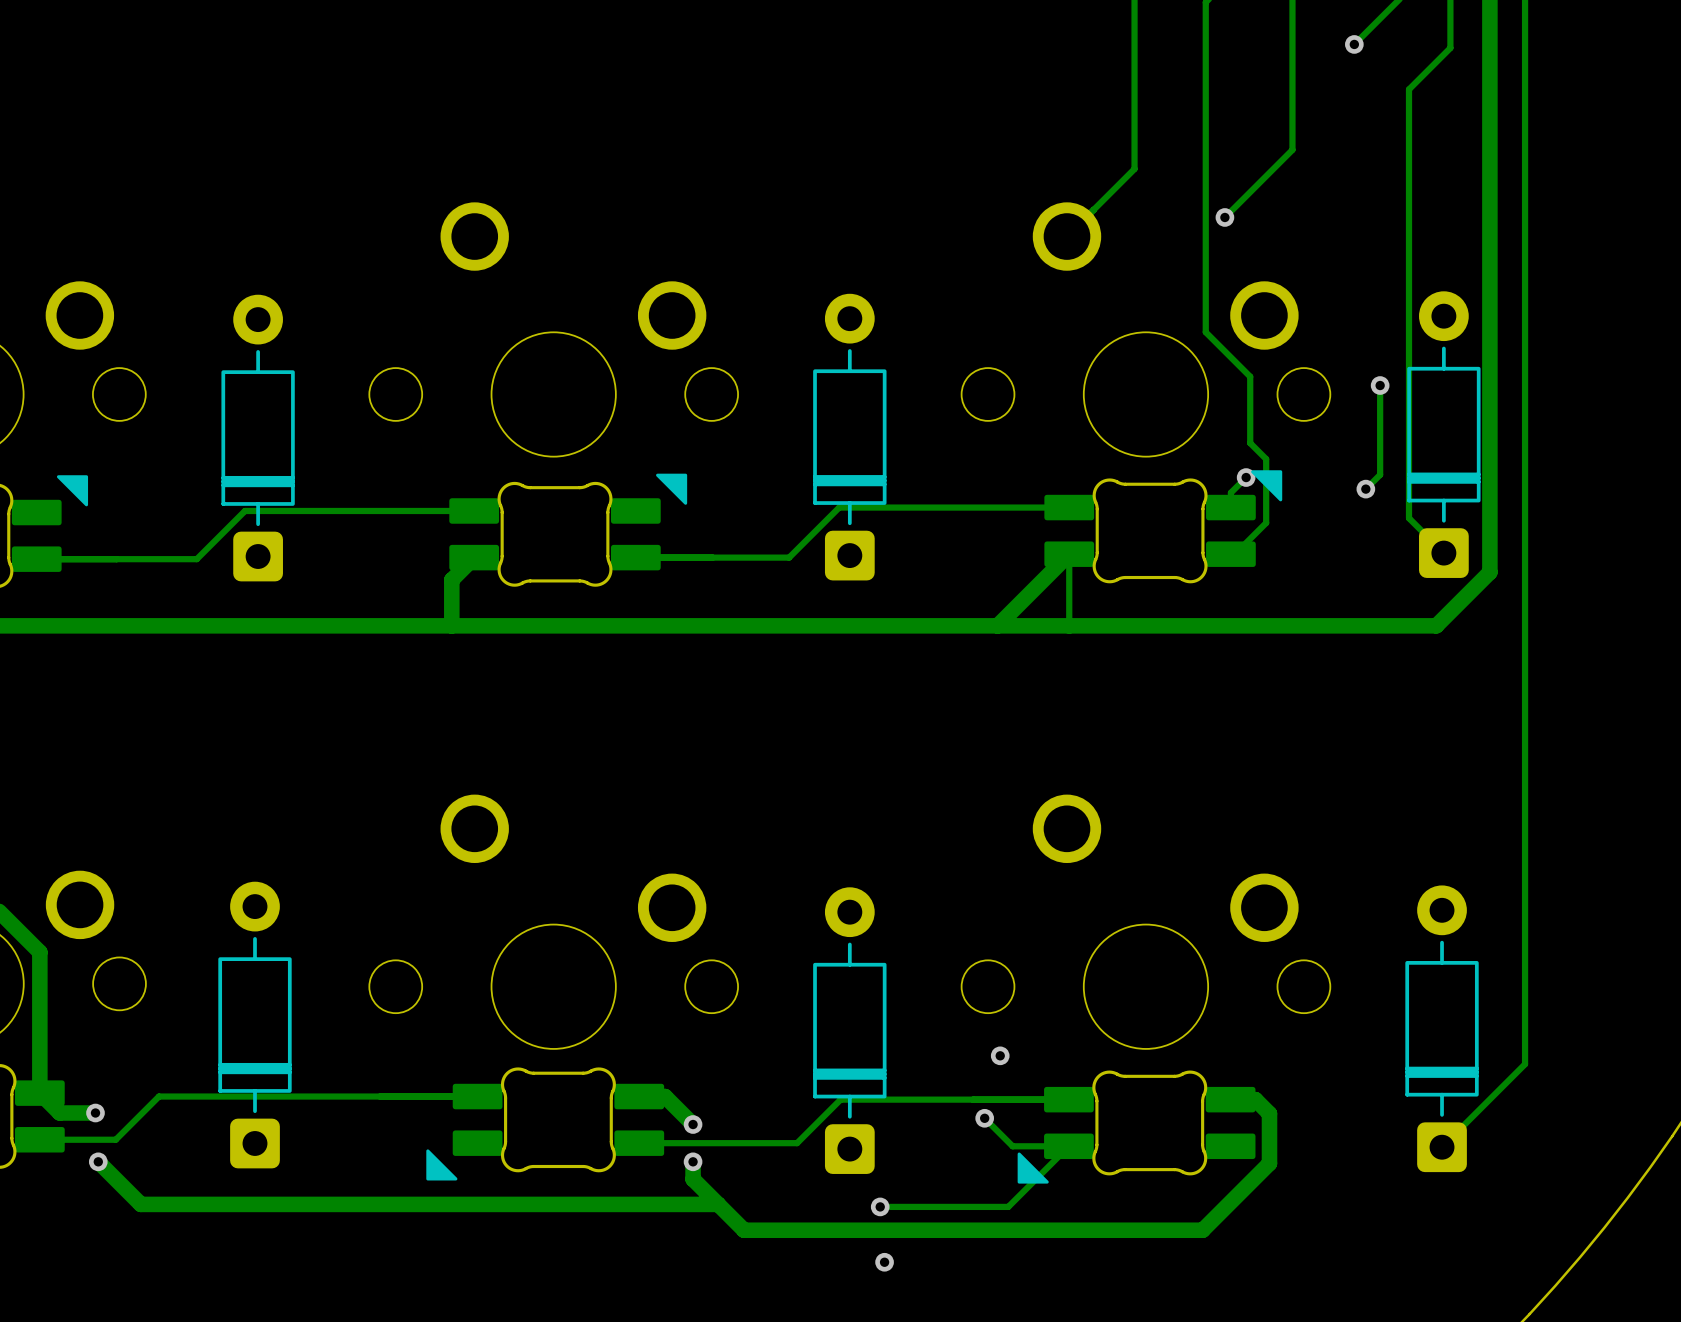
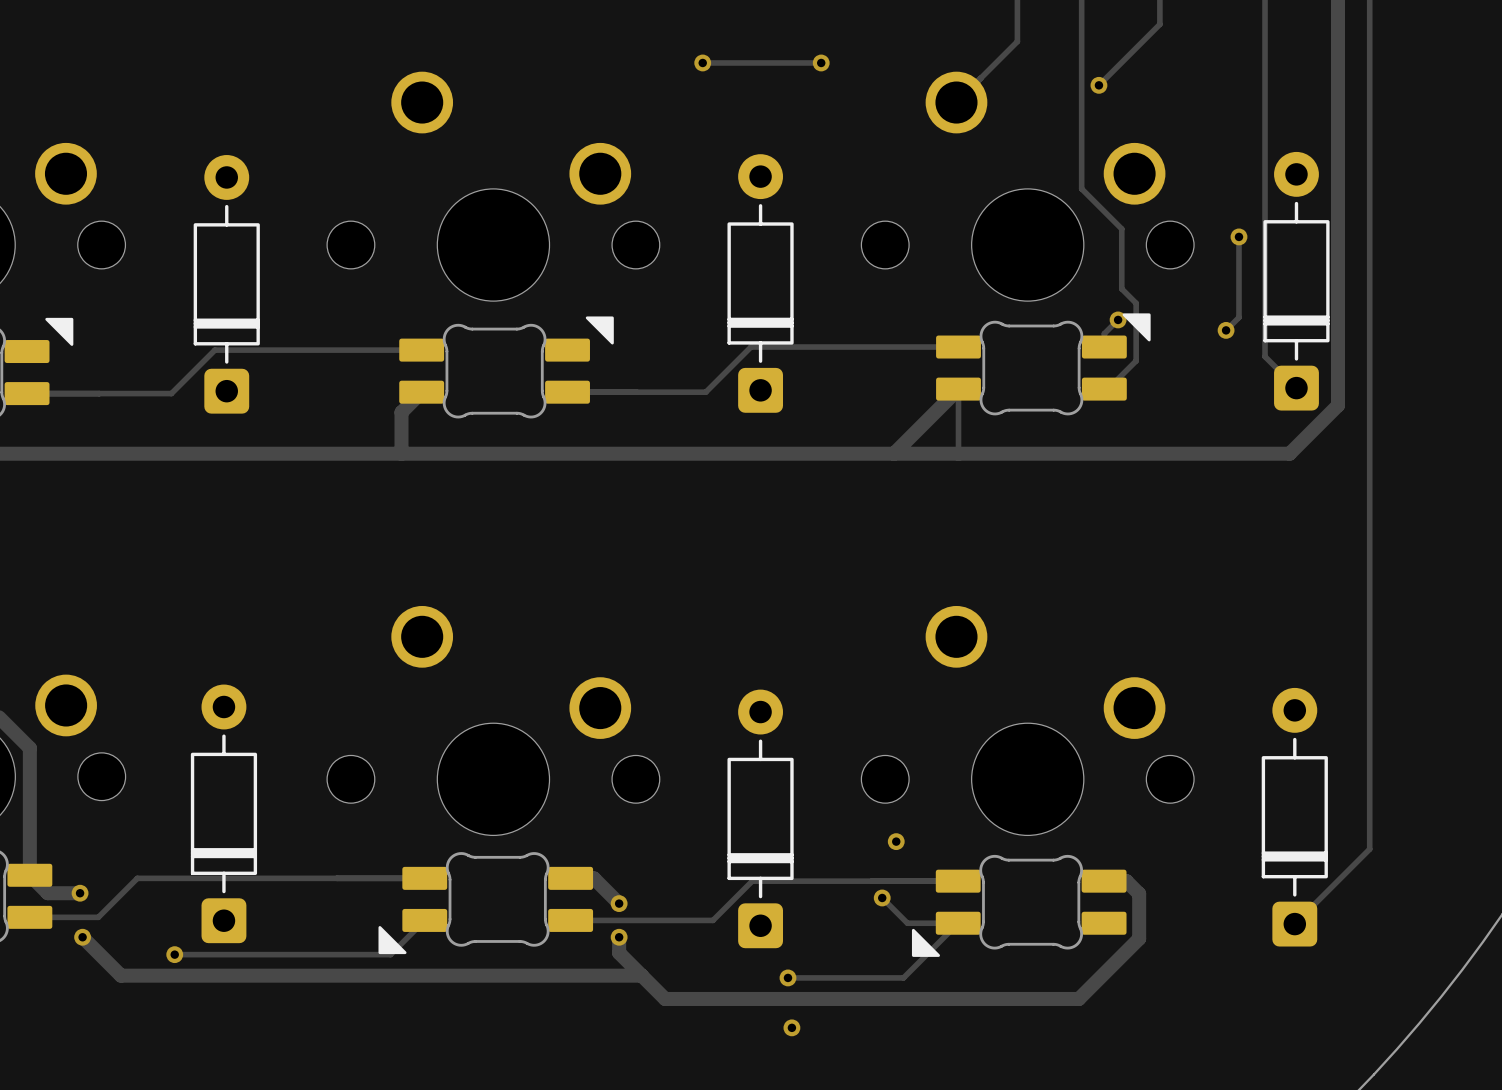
via: none -> (702, 62)
track: none -> (821, 62) (702, 62)
via: none -> (821, 62)
track: none -> (424, 920) (390, 954) (174, 954)
via: none -> (174, 954)

